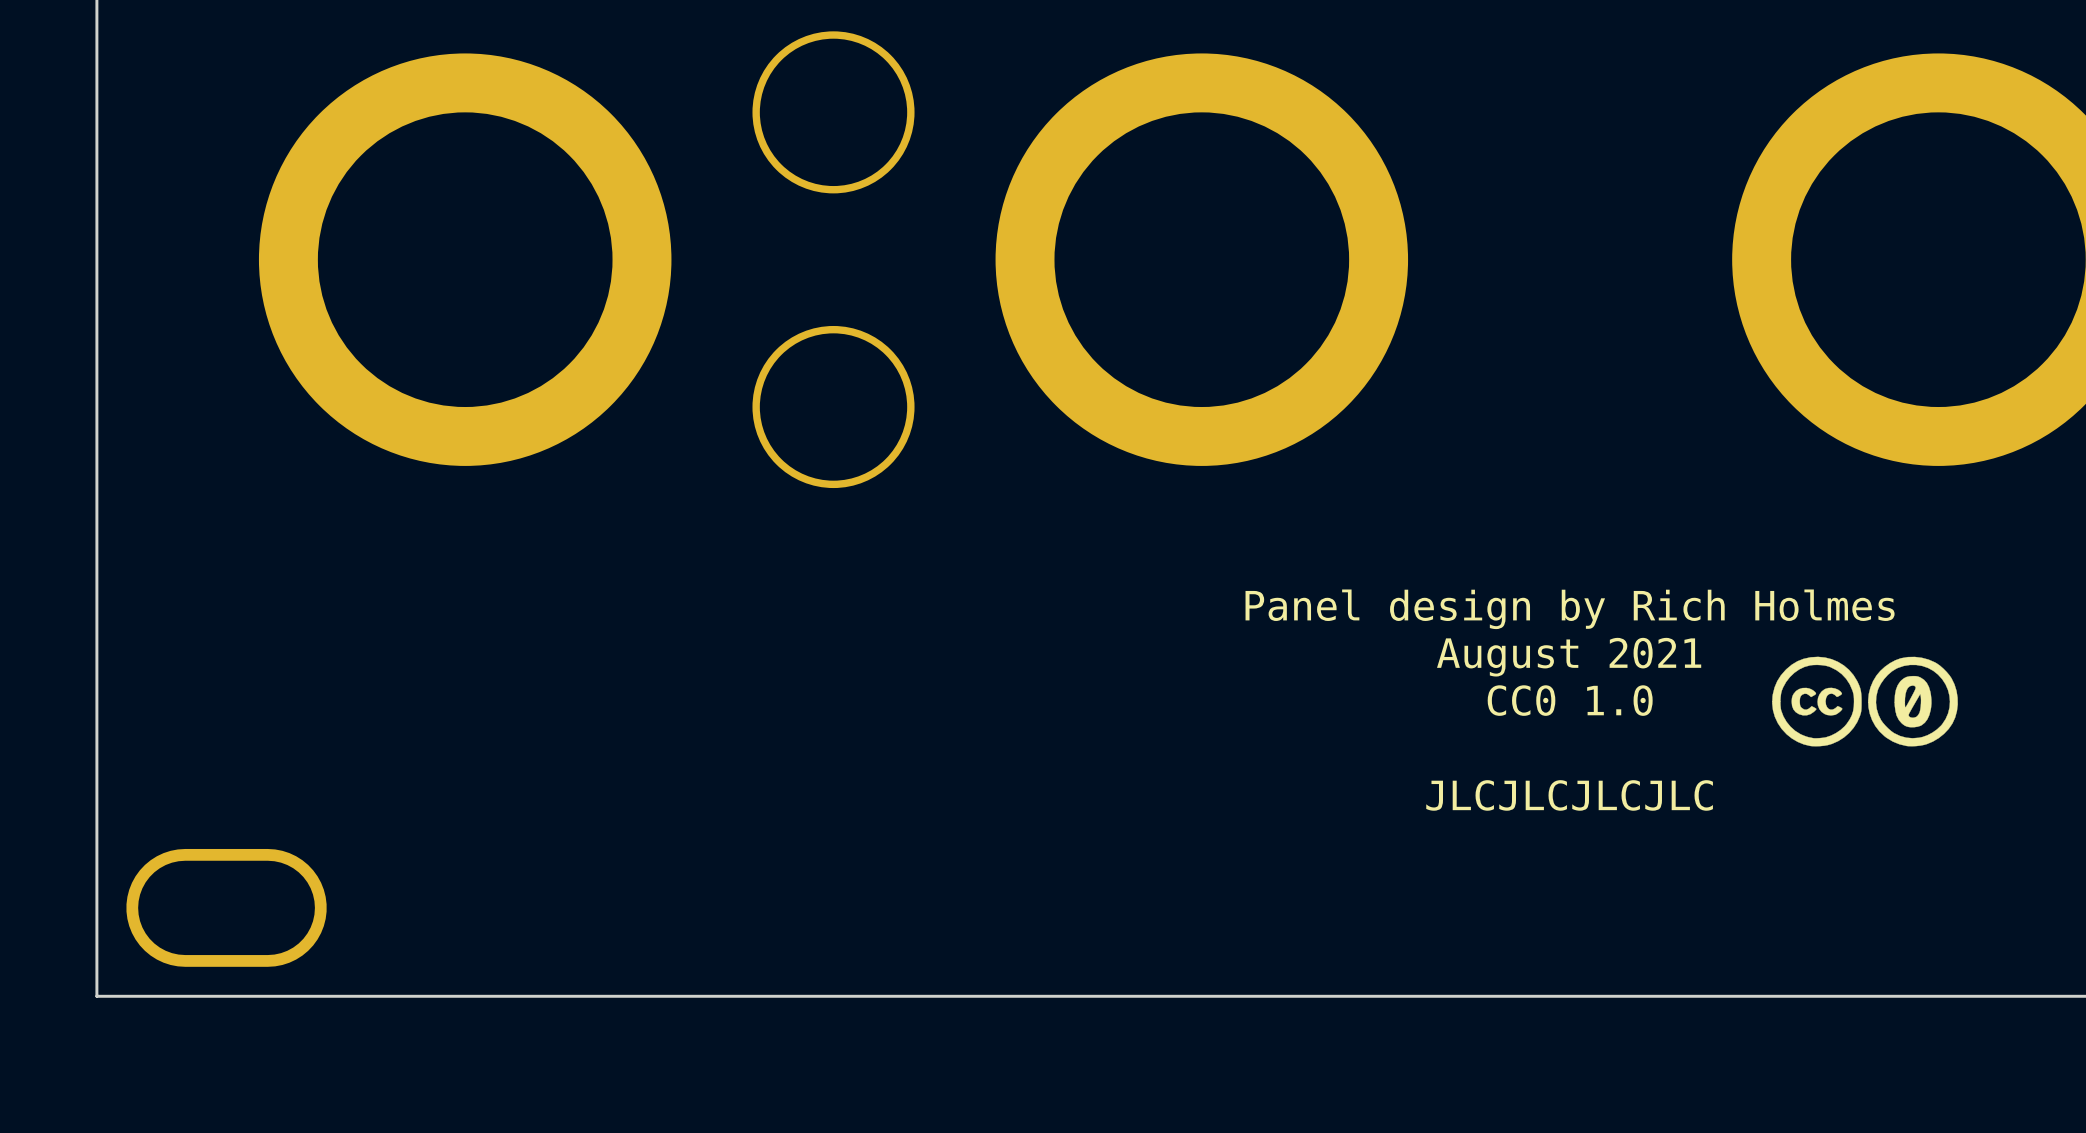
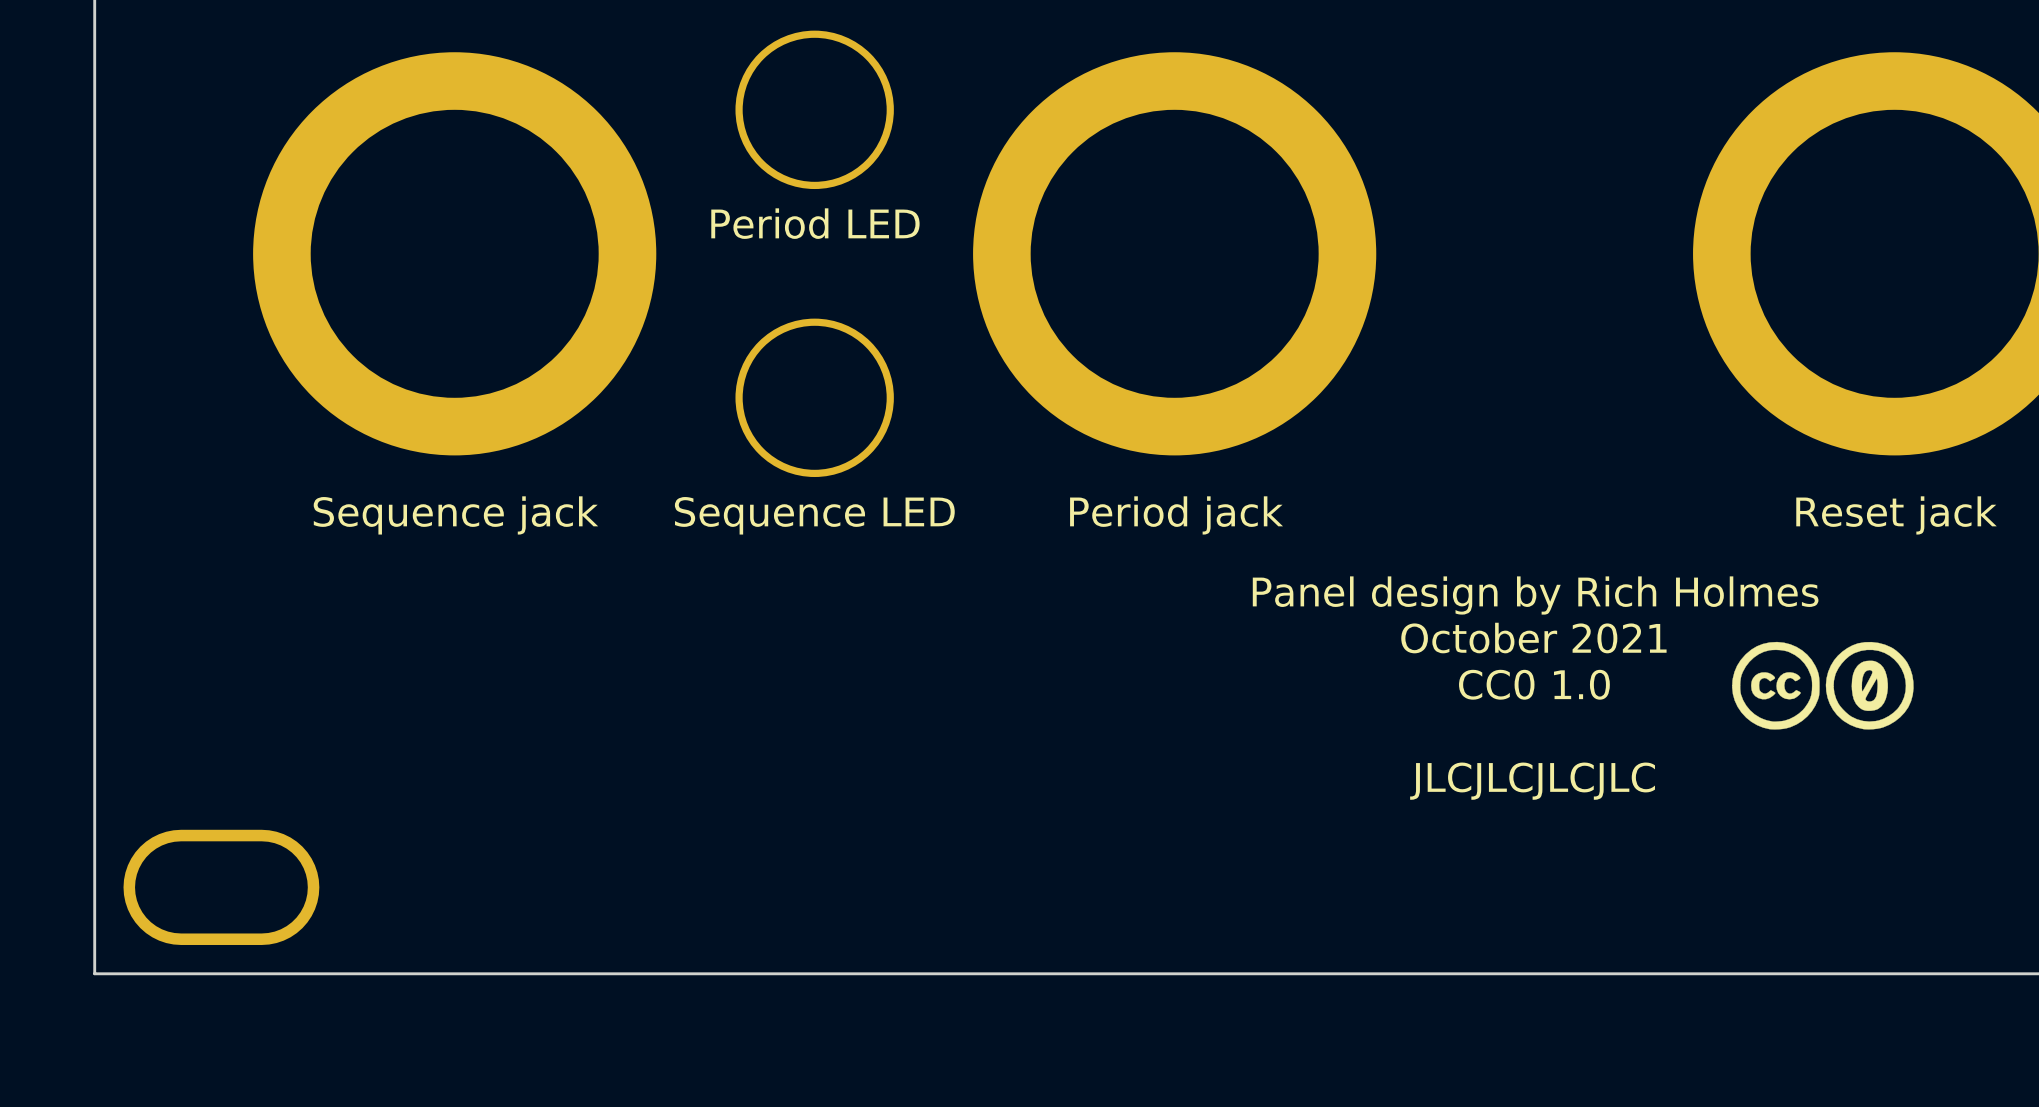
text: none -> Period LED (815, 223)
text: none -> Sequence jack (455, 515)
text: none -> Sequence LED (814, 515)
text: none -> Period jack (1176, 515)
text: none -> Reset jack (1896, 515)
text: August 2021 (1569, 657) -> October 2021 (1533, 638)

